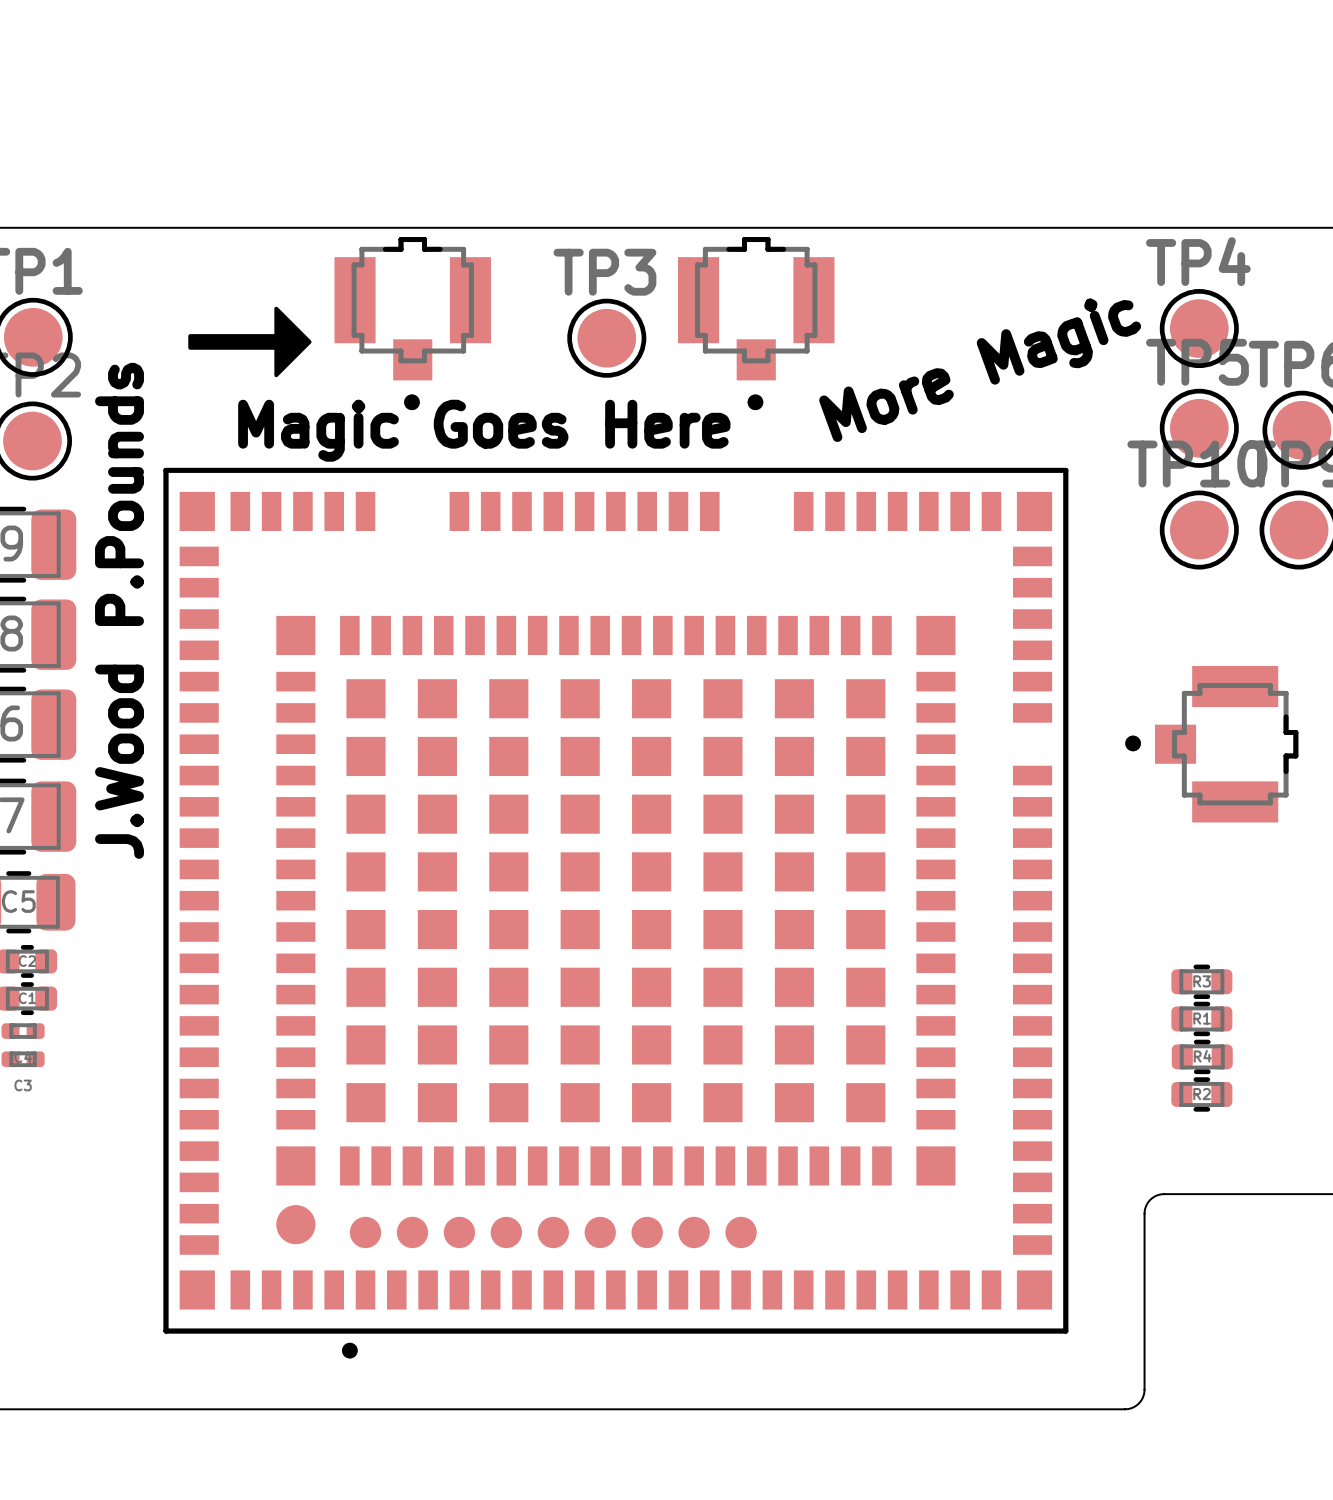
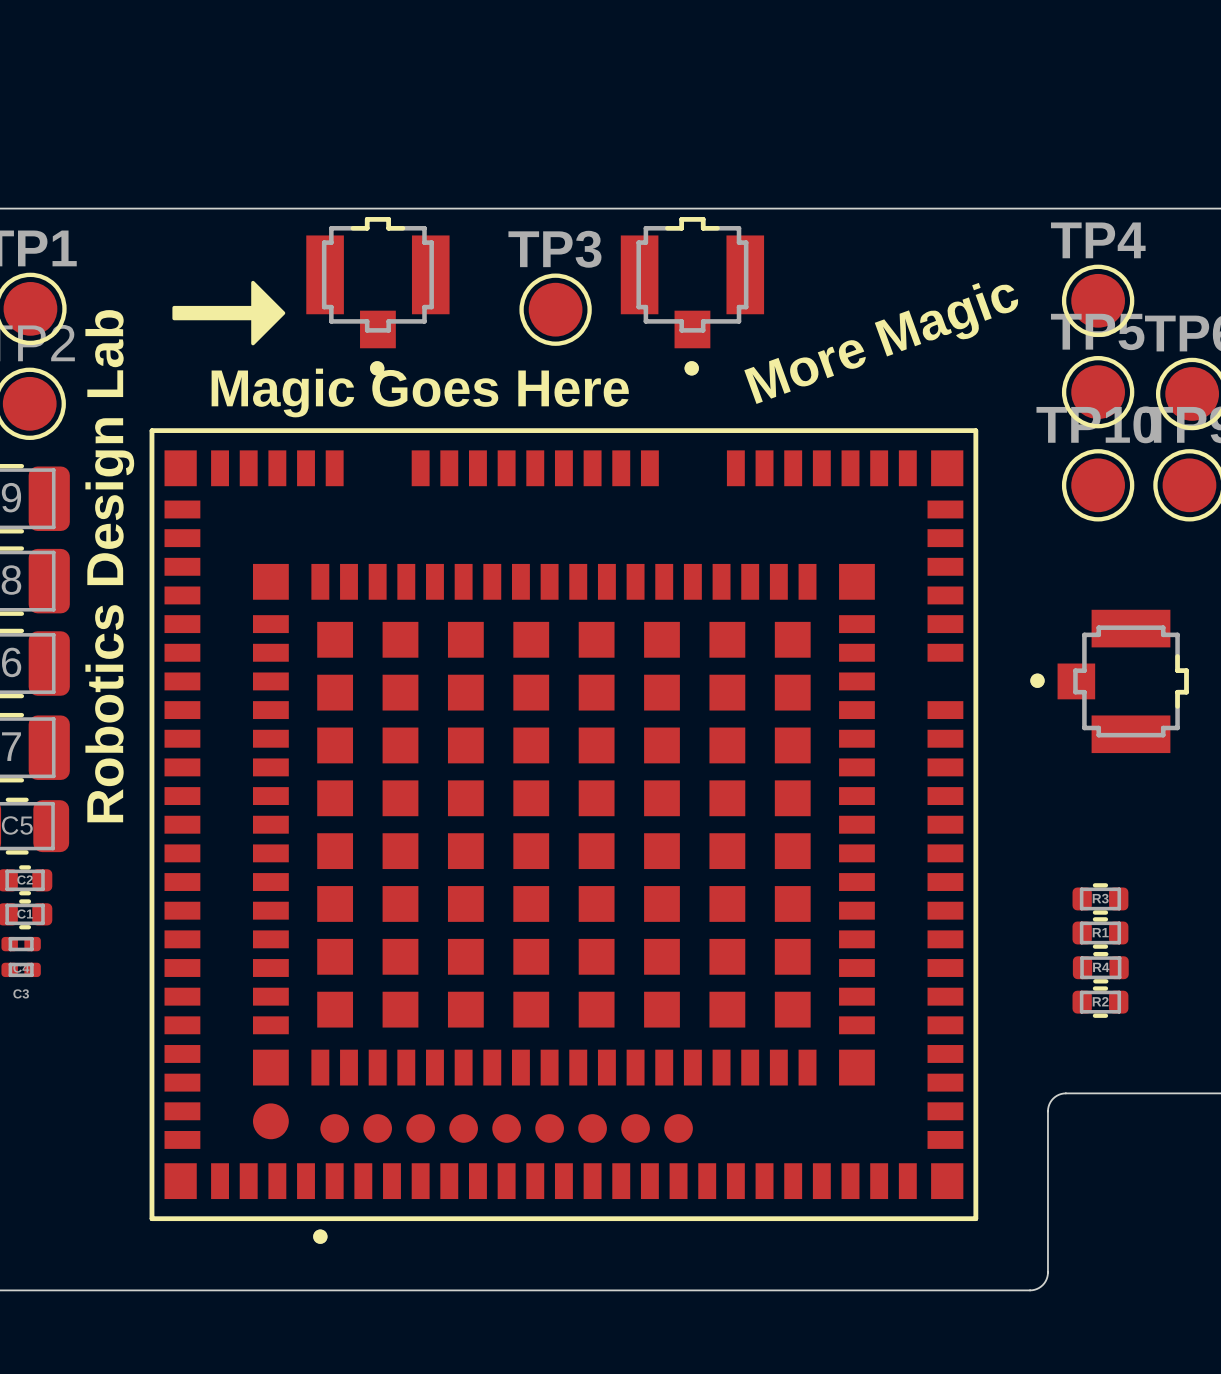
part text: none -> Robotics Design Lab (109, 566)
text: J.Wood P.Pounds (119, 610) -> none

